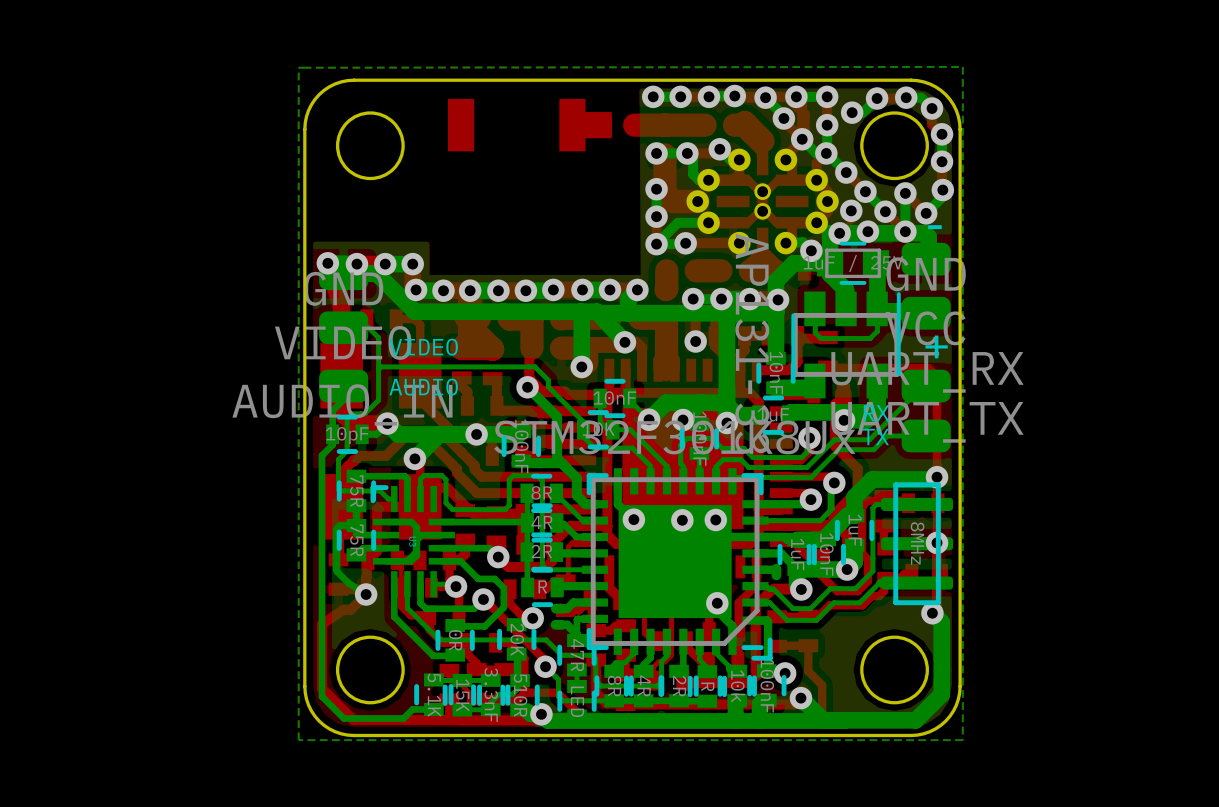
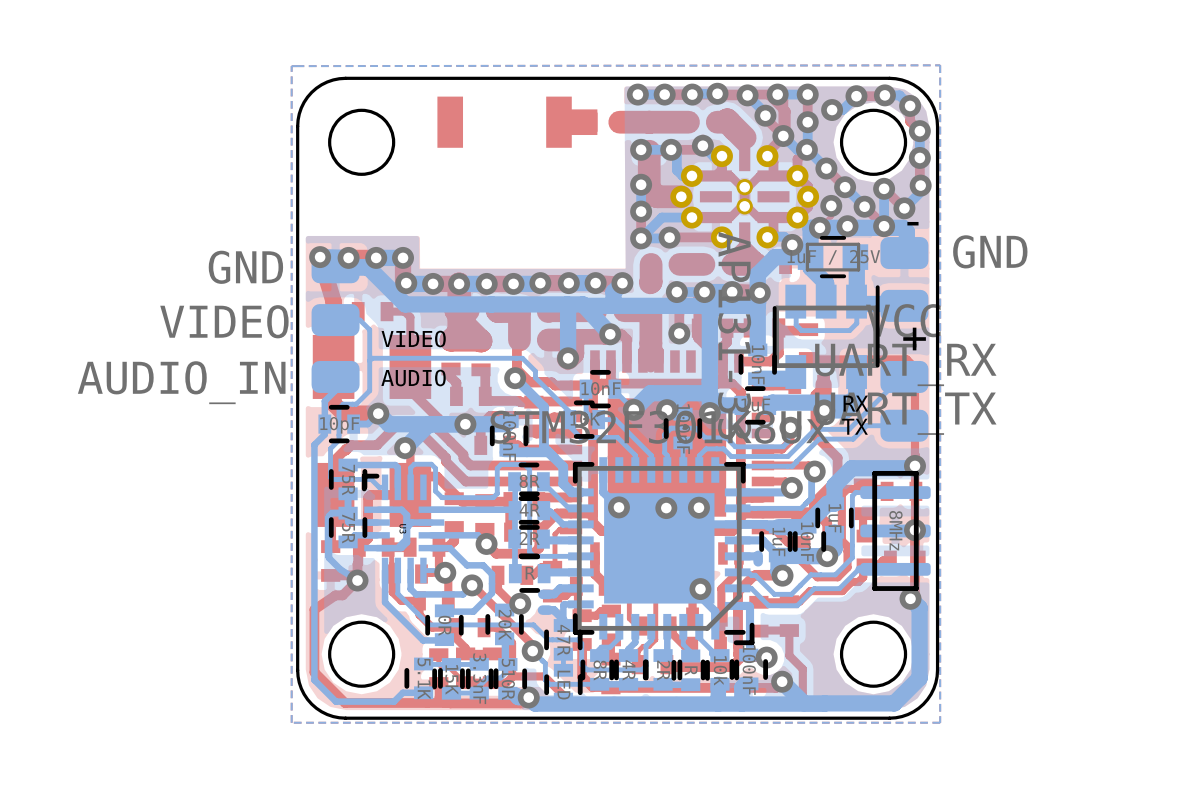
part value position: GND (926, 274) -> GND (990, 251)
part value position: GND (343, 288) -> GND (245, 267)
part value position: VIDEO (343, 342) -> VIDEO (224, 321)
part value position: AUDIO_IN (342, 404) -> AUDIO_IN (181, 382)

